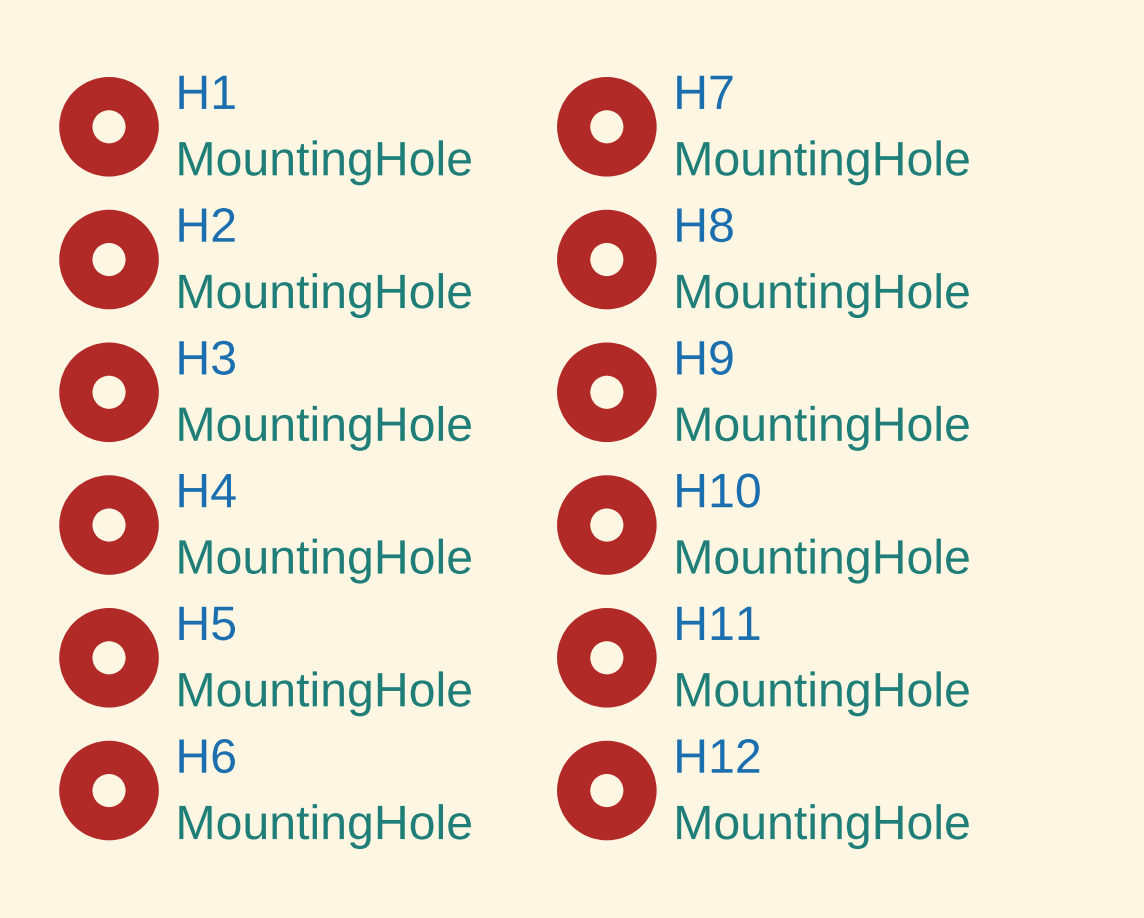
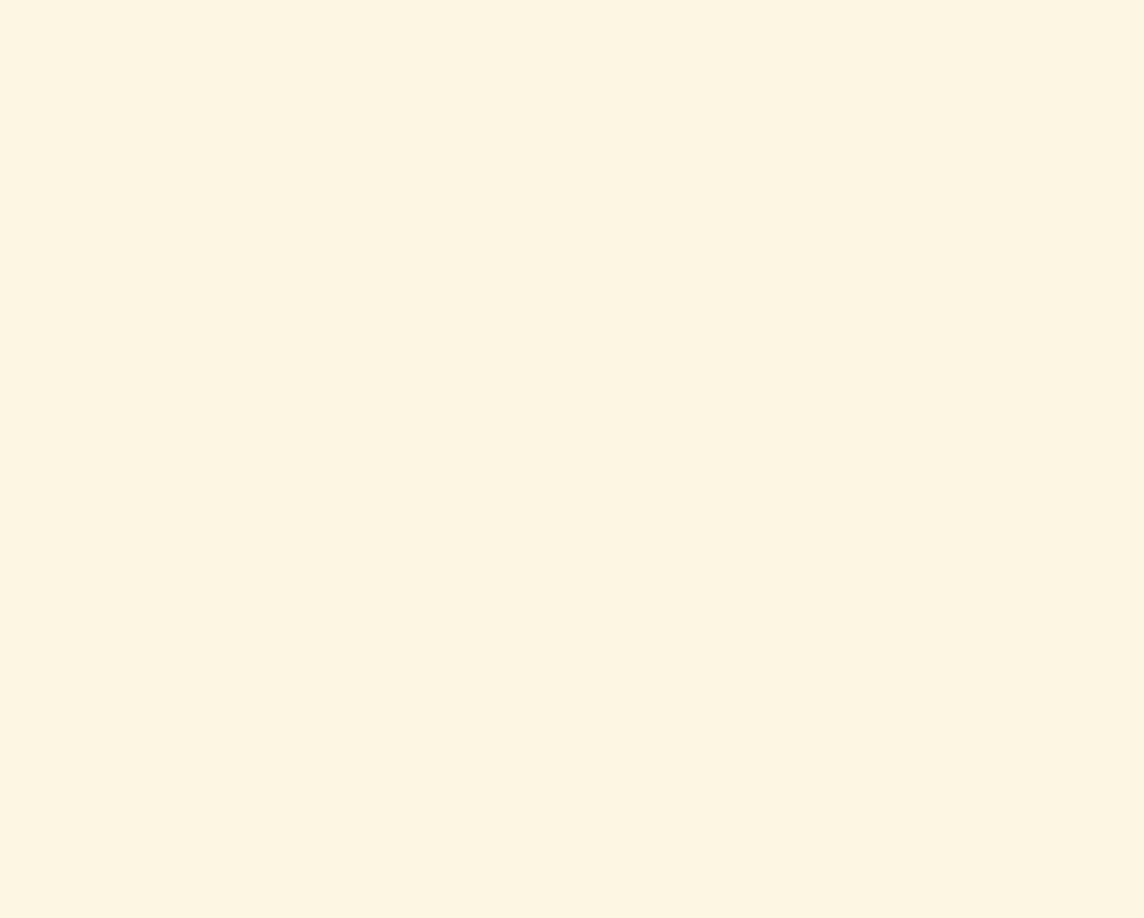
H1: MountingHole (109, 126) -> none
H7: MountingHole (606, 126) -> none
H2: MountingHole (109, 259) -> none
H8: MountingHole (606, 259) -> none
H3: MountingHole (109, 392) -> none
H9: MountingHole (606, 392) -> none
H4: MountingHole (109, 525) -> none
H10: MountingHole (606, 525) -> none
H5: MountingHole (109, 657) -> none
H11: MountingHole (606, 657) -> none
H6: MountingHole (109, 790) -> none
H12: MountingHole (606, 790) -> none

